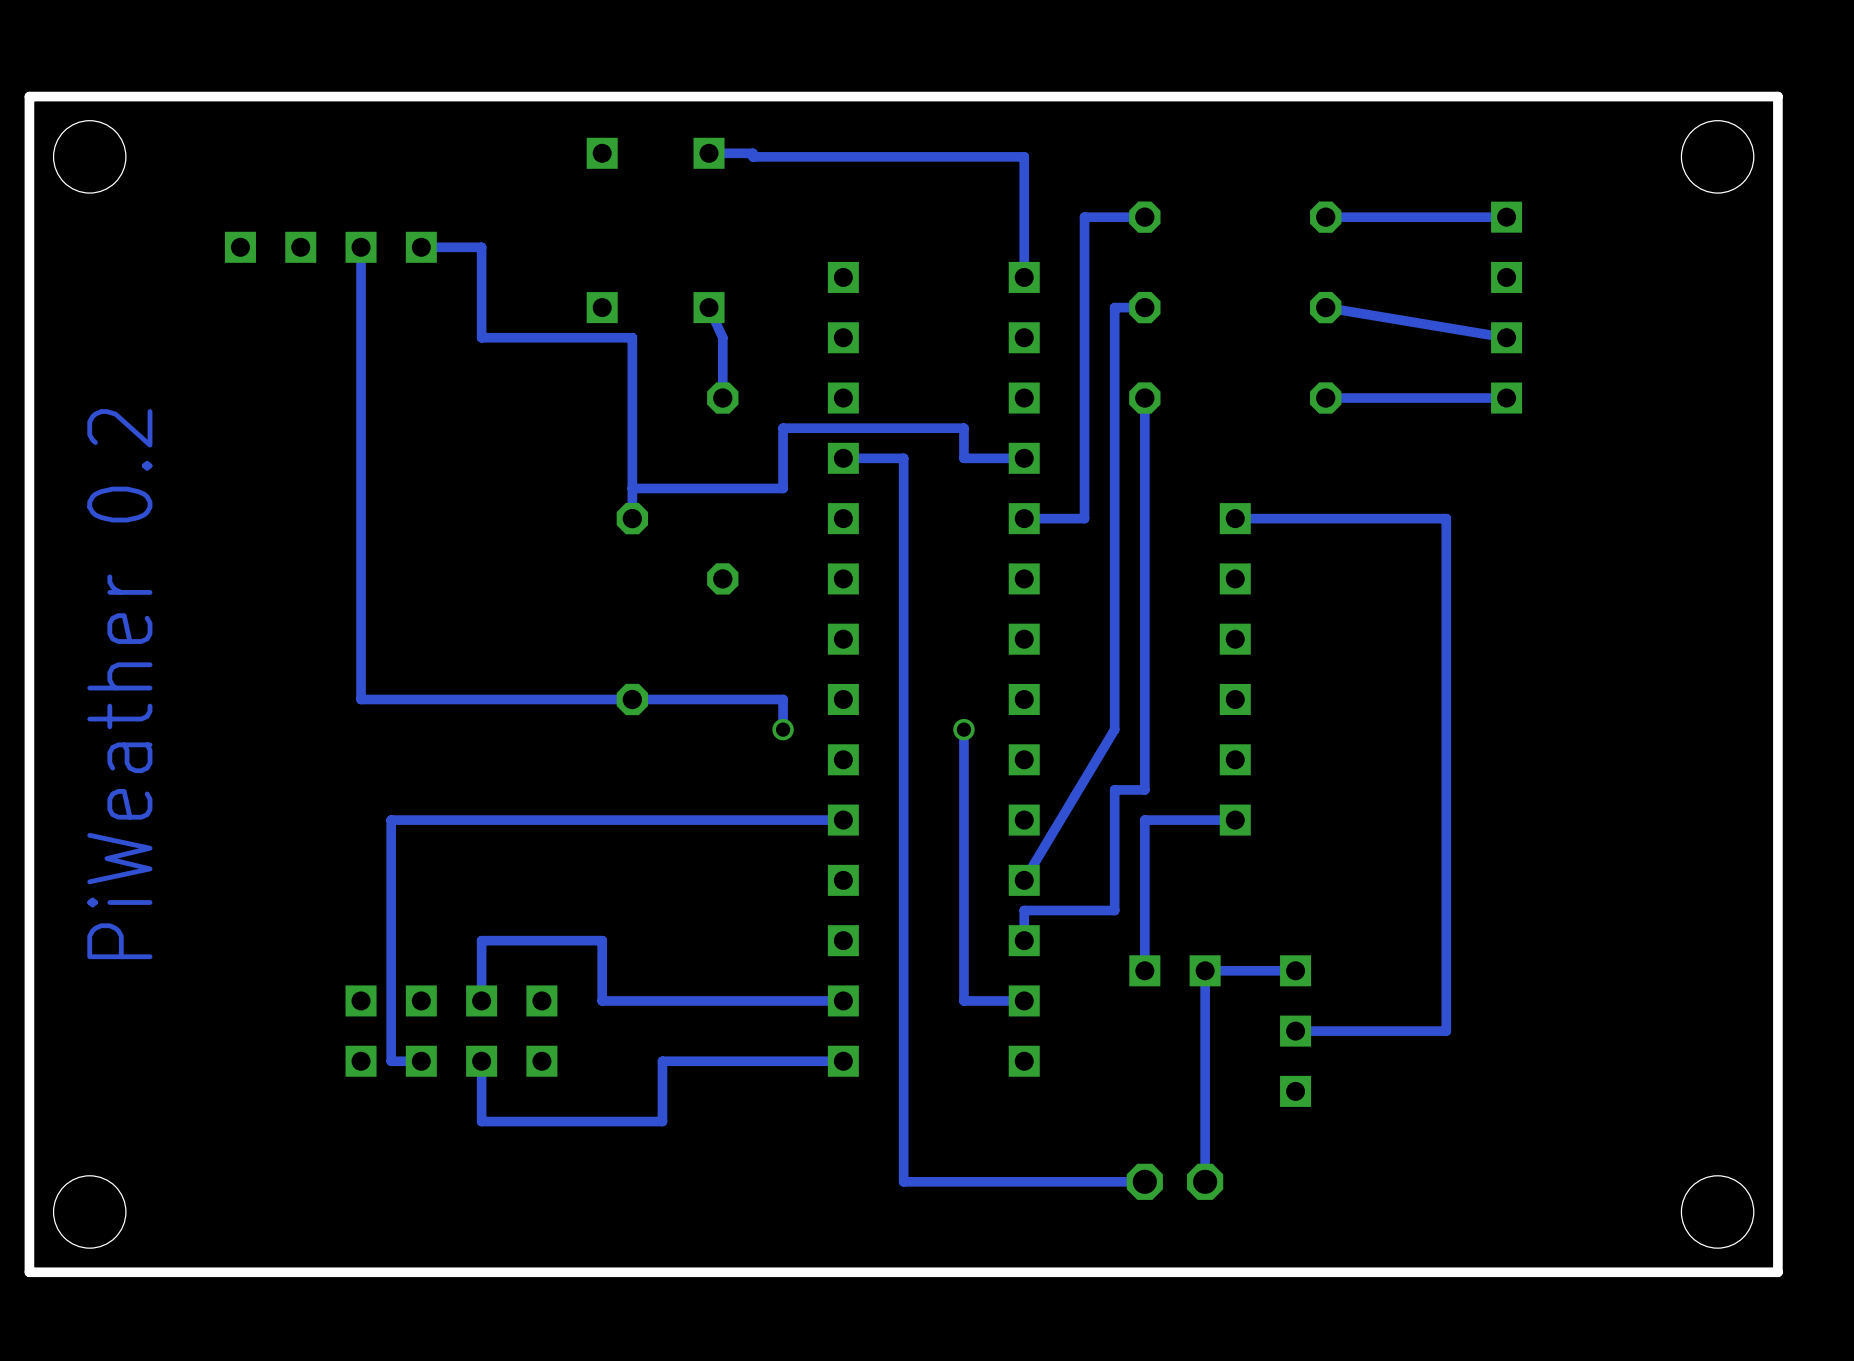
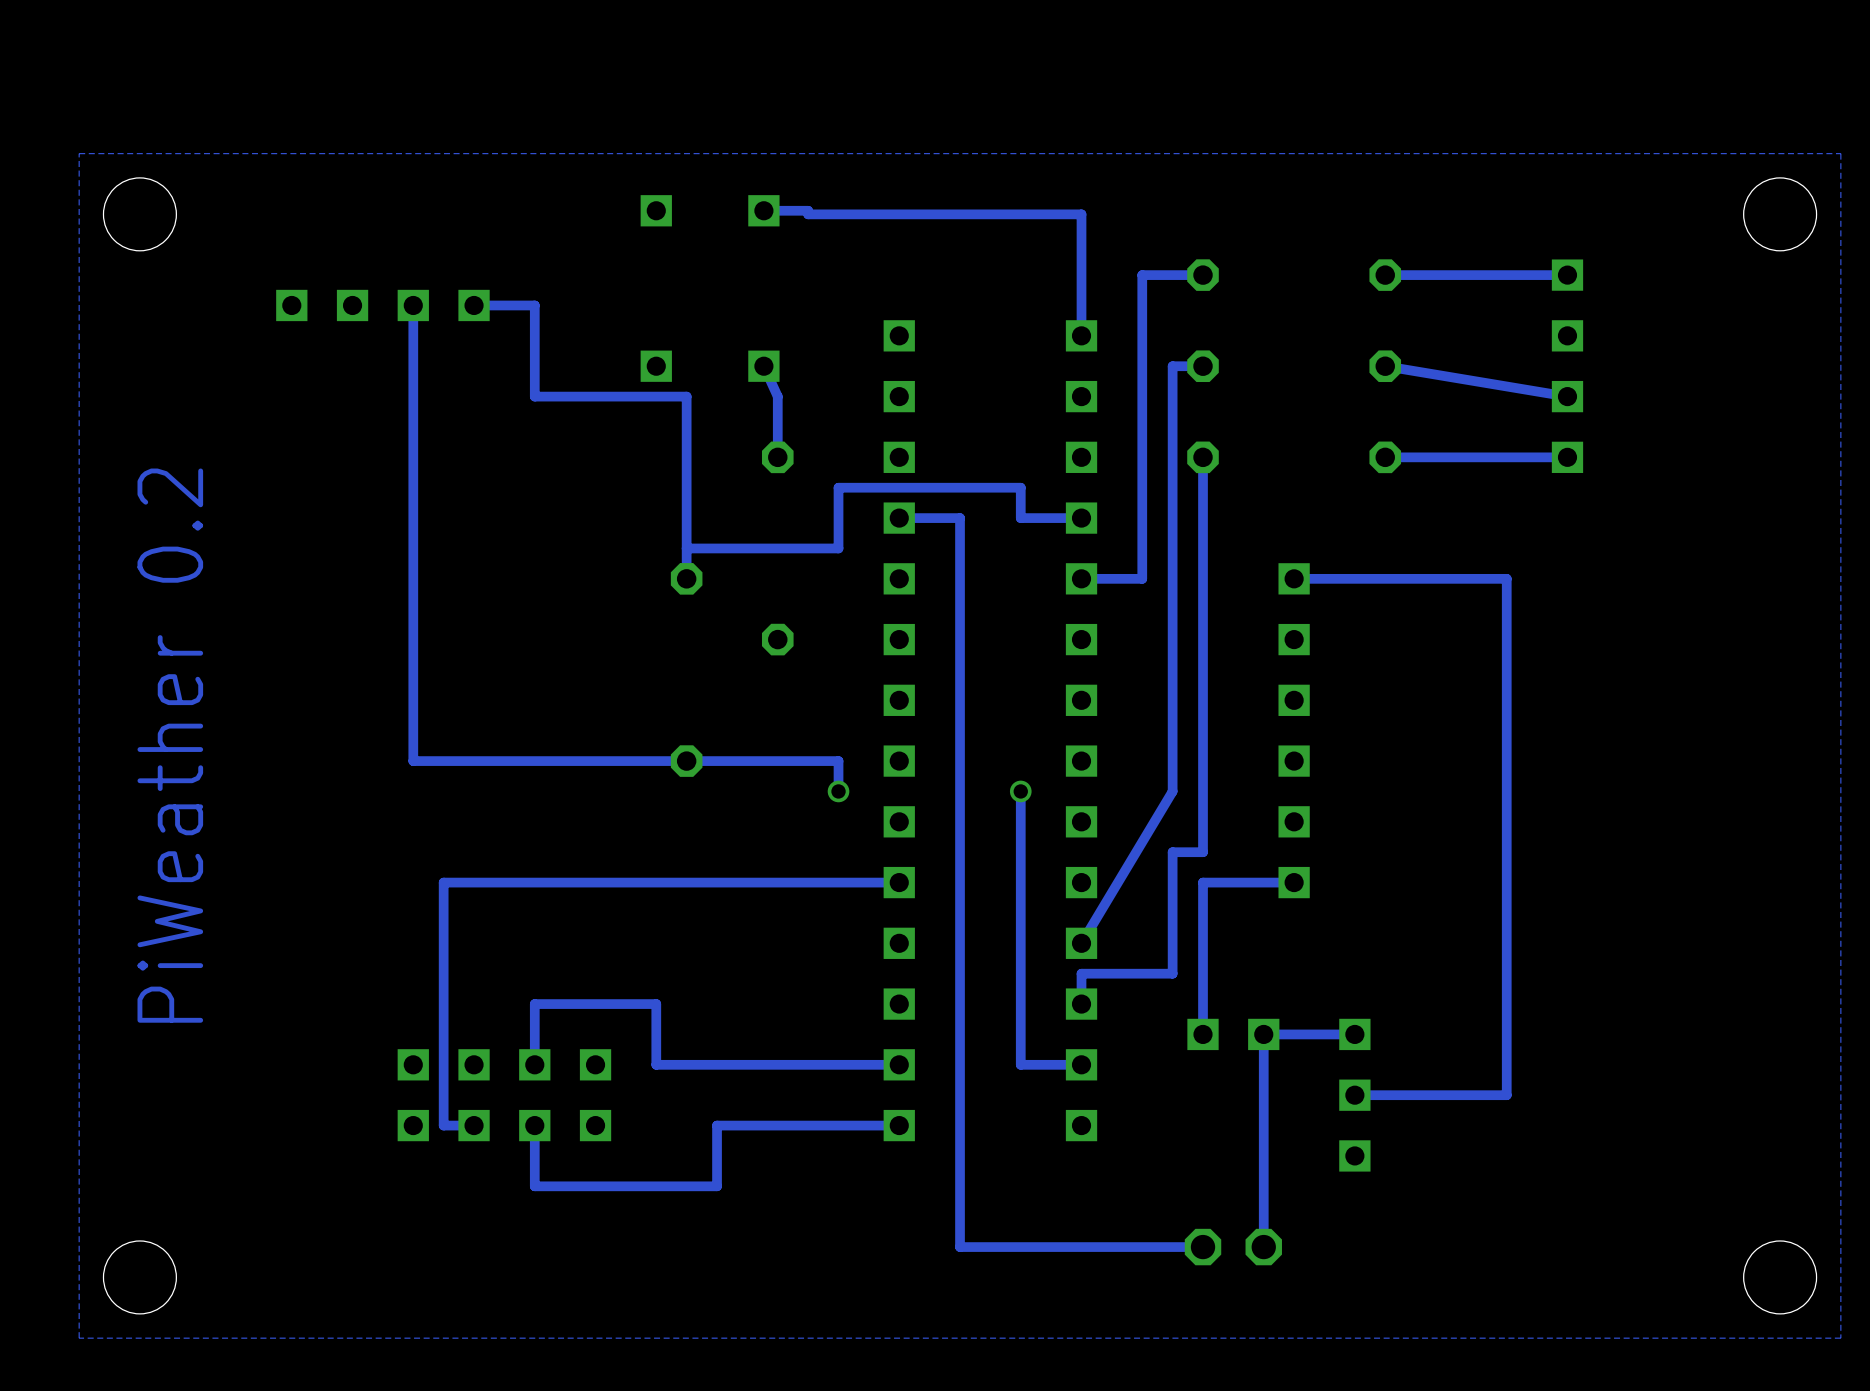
board edge: (1777, 96) (29, 96) (29, 1272) (1777, 1272) (1777, 96) -> none

